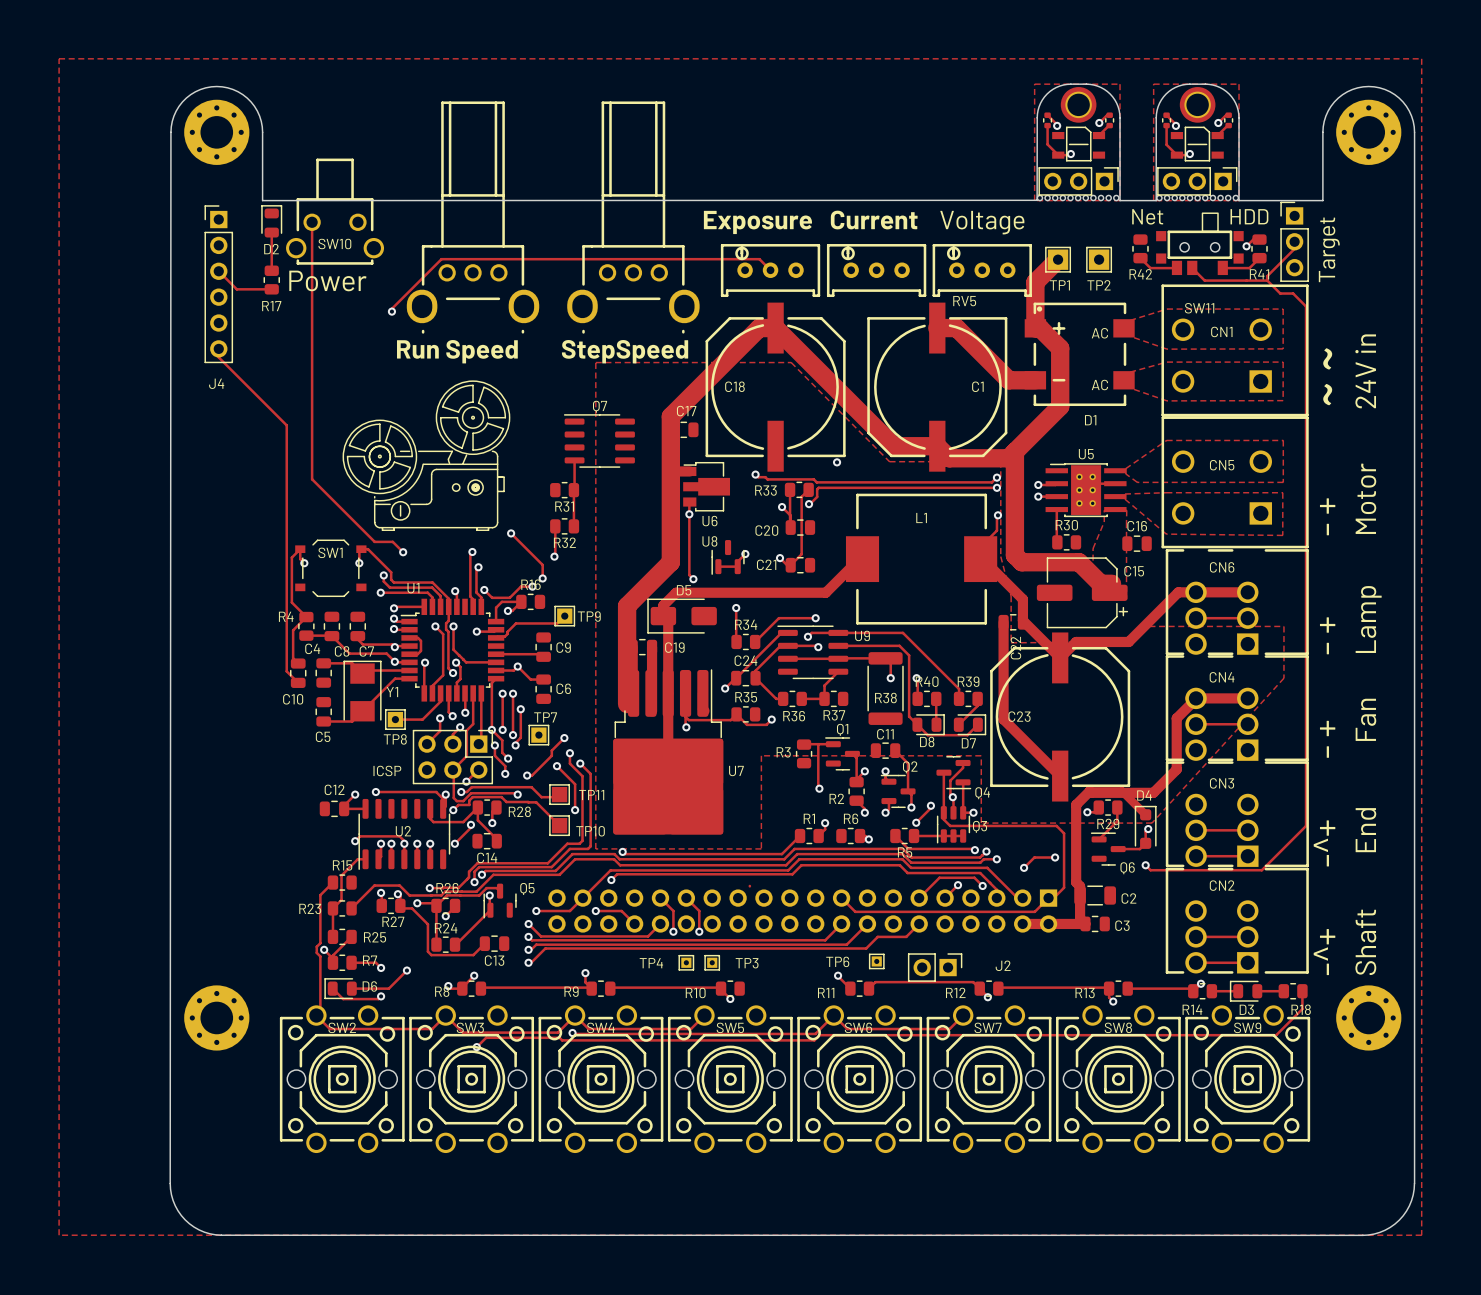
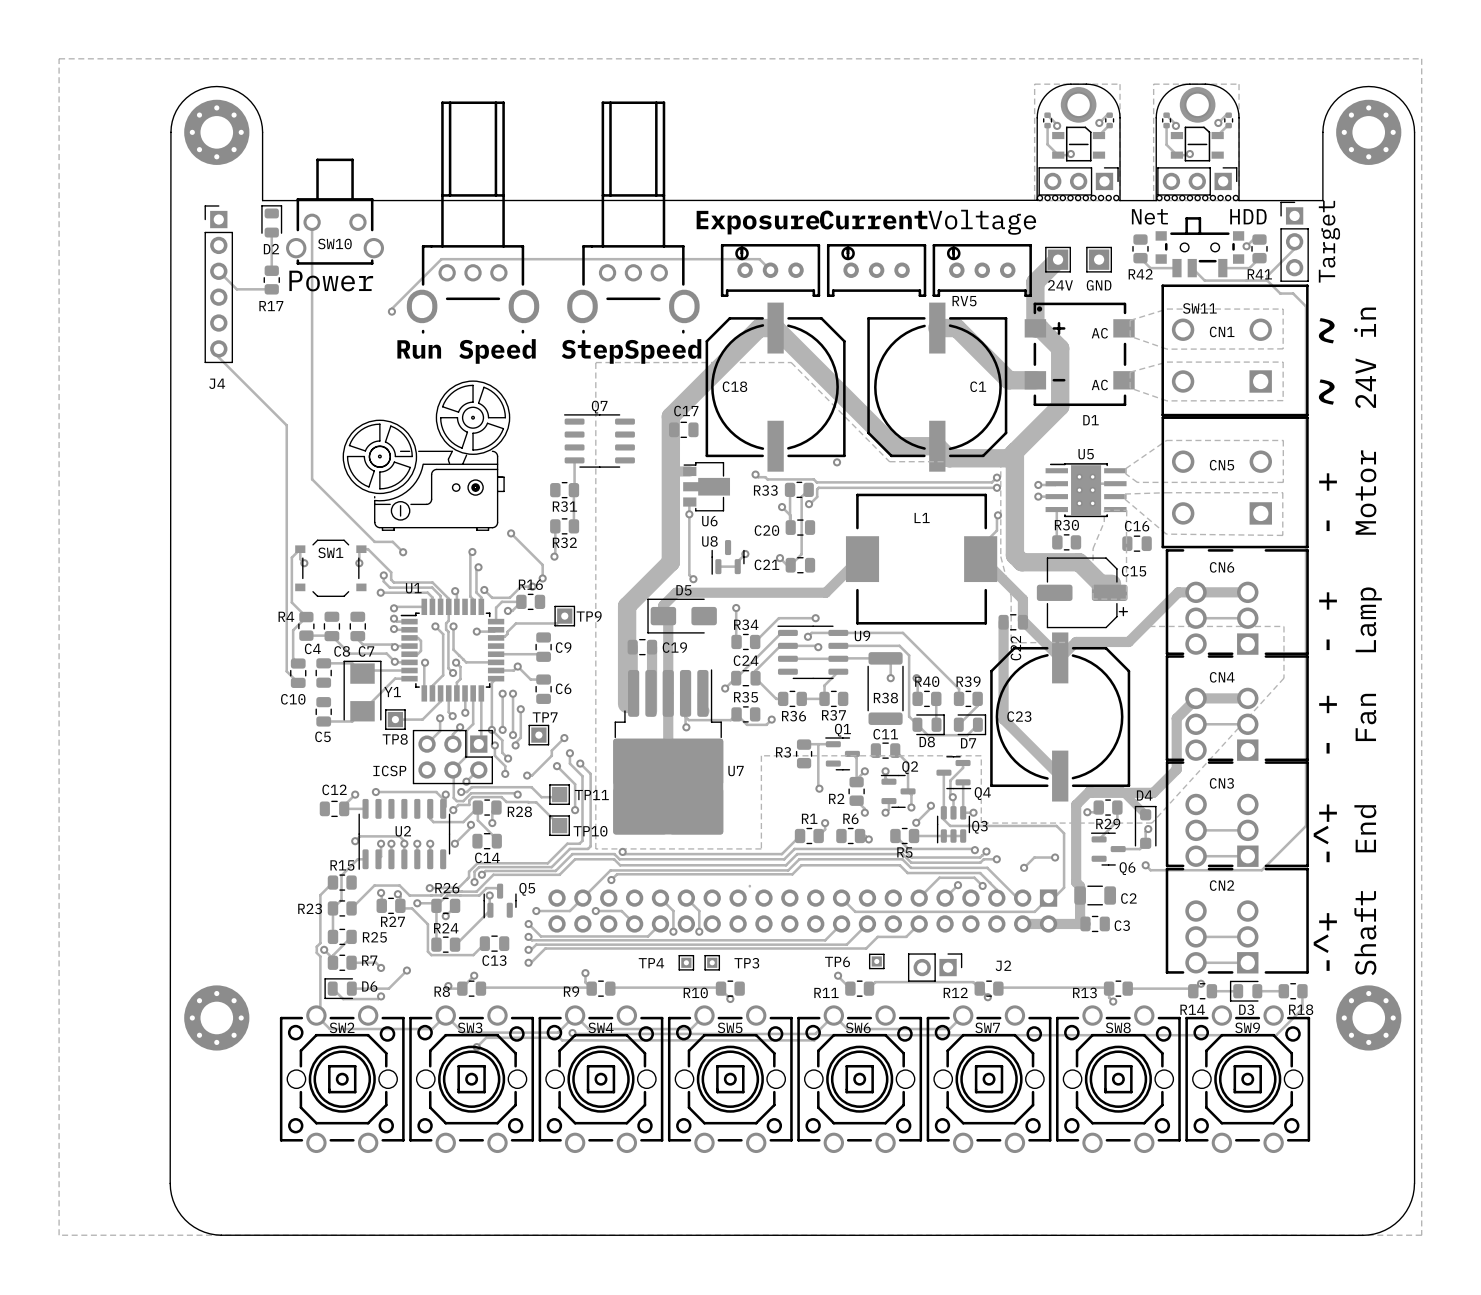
SW11 footprint: [1156, 212, 1244, 276] -> [1155, 217, 1245, 278]
TP1 name: TP1 (1059, 285) -> 24V (1060, 285)
TP2 name: TP2 (1098, 285) -> GND (1099, 285)

